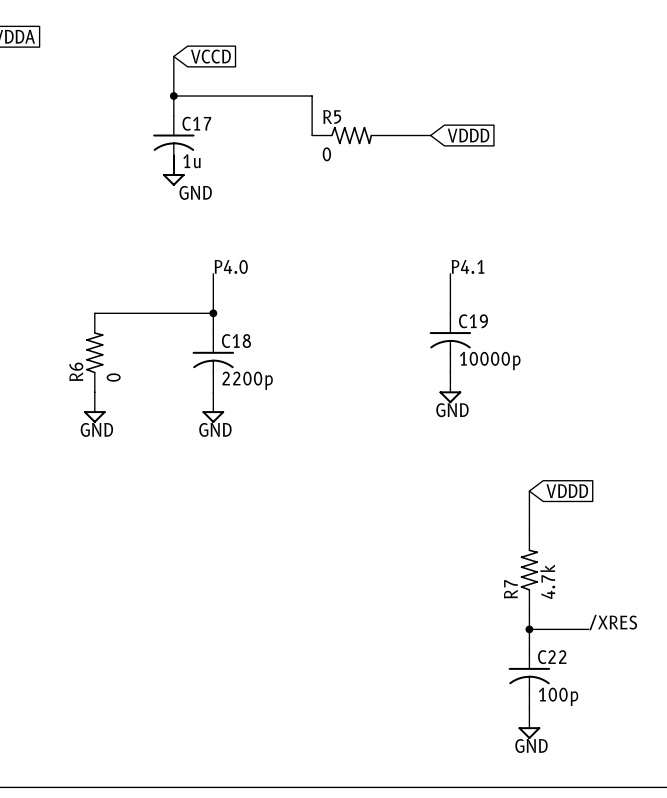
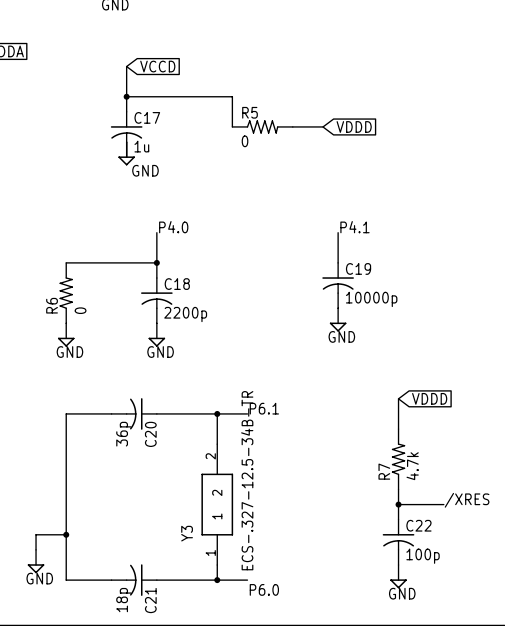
label: none -> P6.1 (264, 408)
wire: none -> (111, 413) (66, 413) (66, 580) (111, 580)
C20: none -> 36p (134, 413)
wire: none -> (156, 413) (247, 413)
wire: none -> (217, 413) (217, 444)
junction: none -> (217, 413)
Y3: none -> ECS-.327-12.5-34B-TR (217, 504)
wire: none -> (66, 534) (36, 534) (36, 549)
junction: none -> (66, 534)
power symbol: none -> GND (36, 561)
wire: none -> (217, 565) (217, 580)
C21: none -> 18p (134, 580)
wire: none -> (156, 580) (247, 580)
junction: none -> (217, 580)
label: none -> P6.0 (264, 589)

